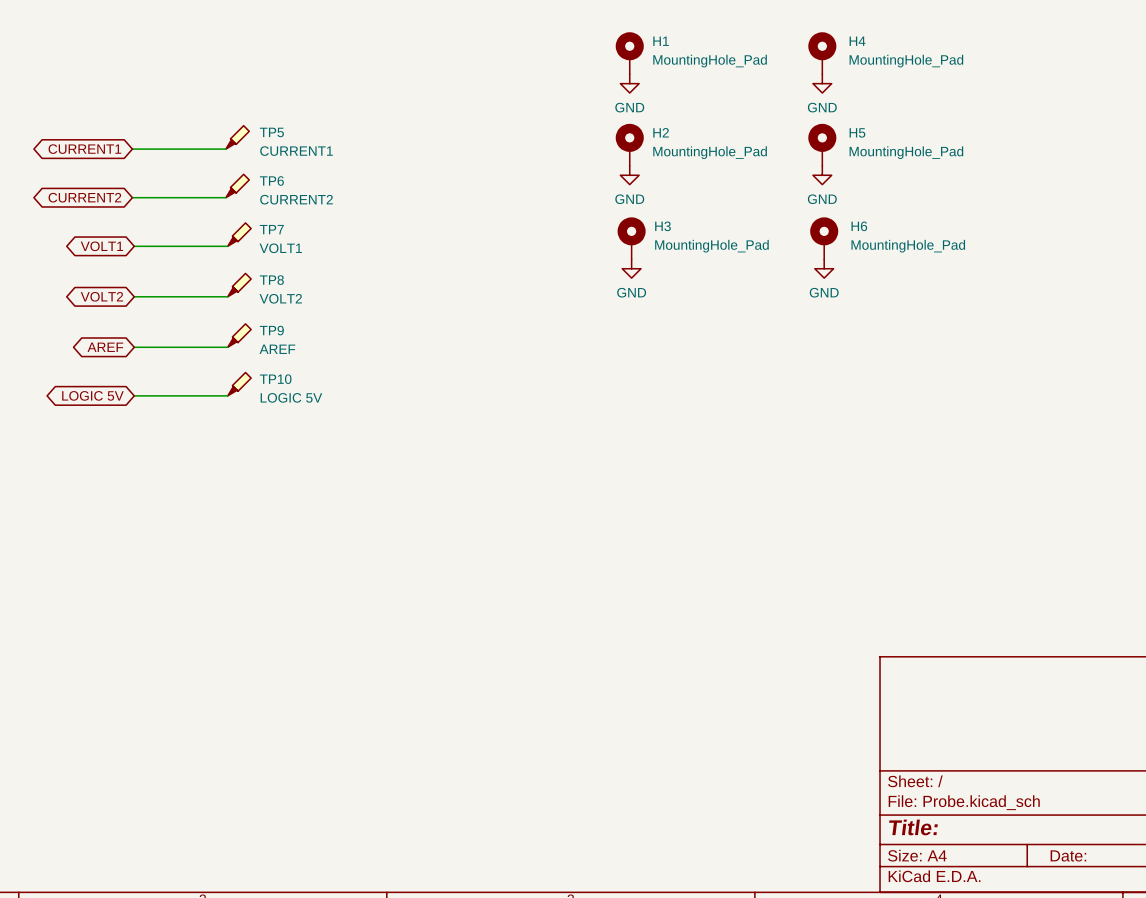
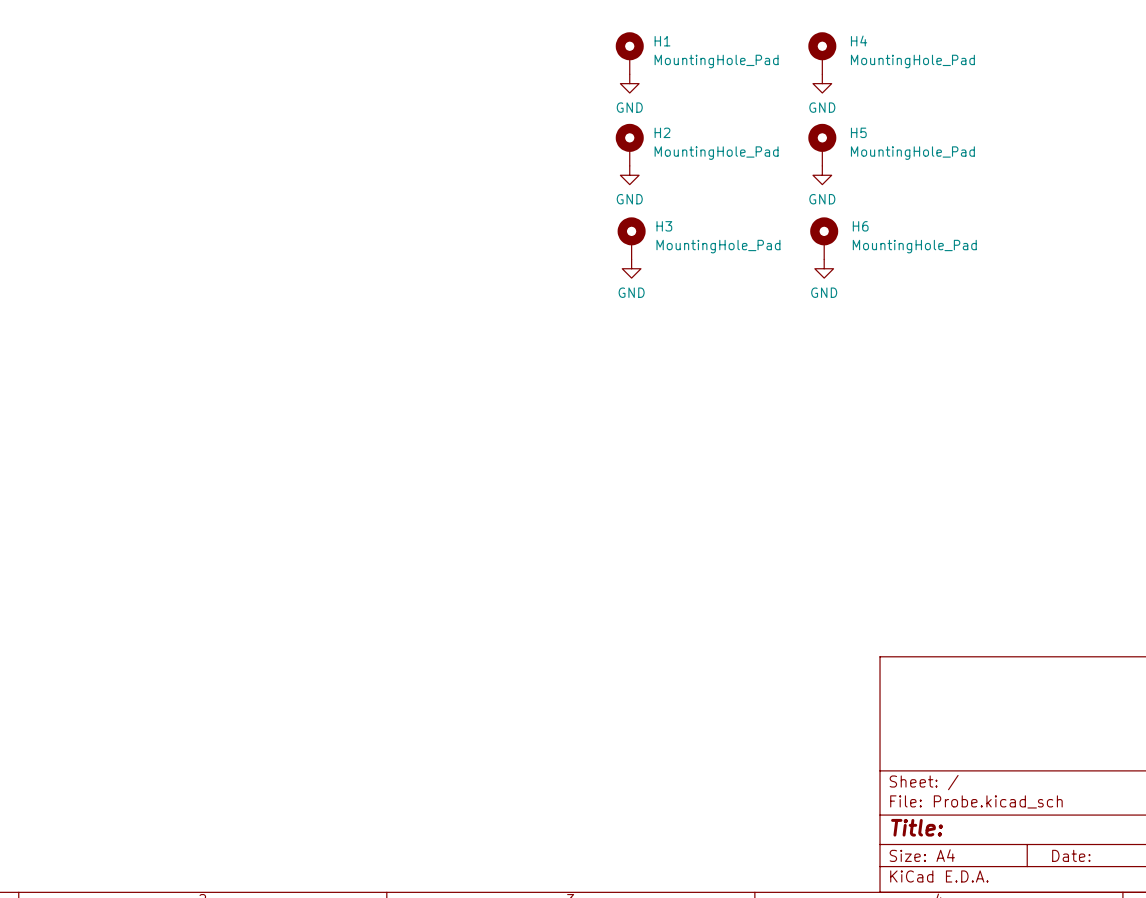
TP5: CURRENT1 (237, 137) -> none
global label: CURRENT1 (84, 149) -> none
wire: (132, 149) (225, 149) -> none
TP6: CURRENT2 (237, 186) -> none
global label: CURRENT2 (84, 197) -> none
wire: (132, 197) (225, 197) -> none
TP7: VOLT1 (239, 234) -> none
global label: VOLT1 (101, 246) -> none
wire: (134, 246) (227, 246) -> none
TP8: VOLT2 (239, 285) -> none
global label: VOLT2 (101, 296) -> none
wire: (134, 296) (227, 296) -> none
TP9: AREF (239, 335) -> none
global label: AREF (105, 347) -> none
wire: (134, 347) (227, 347) -> none
TP10: LOGIC 5V (239, 384) -> none
global label: LOGIC 5V (92, 395) -> none
wire: (134, 395) (227, 395) -> none

